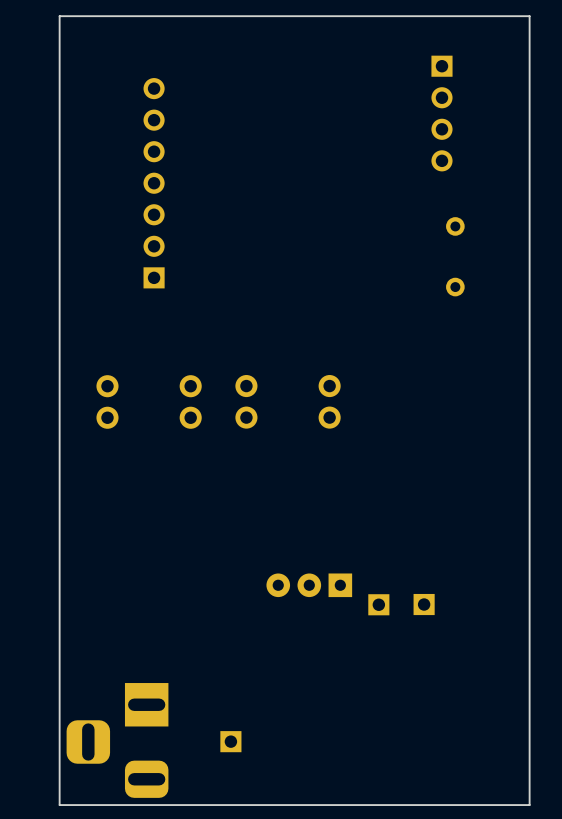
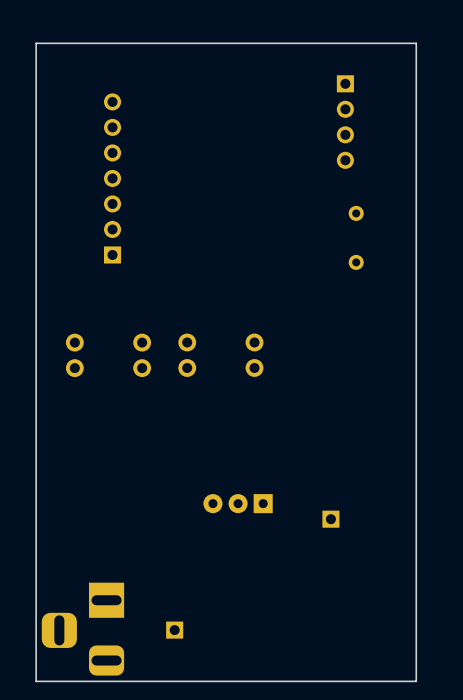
part: (378, 604) -> none

